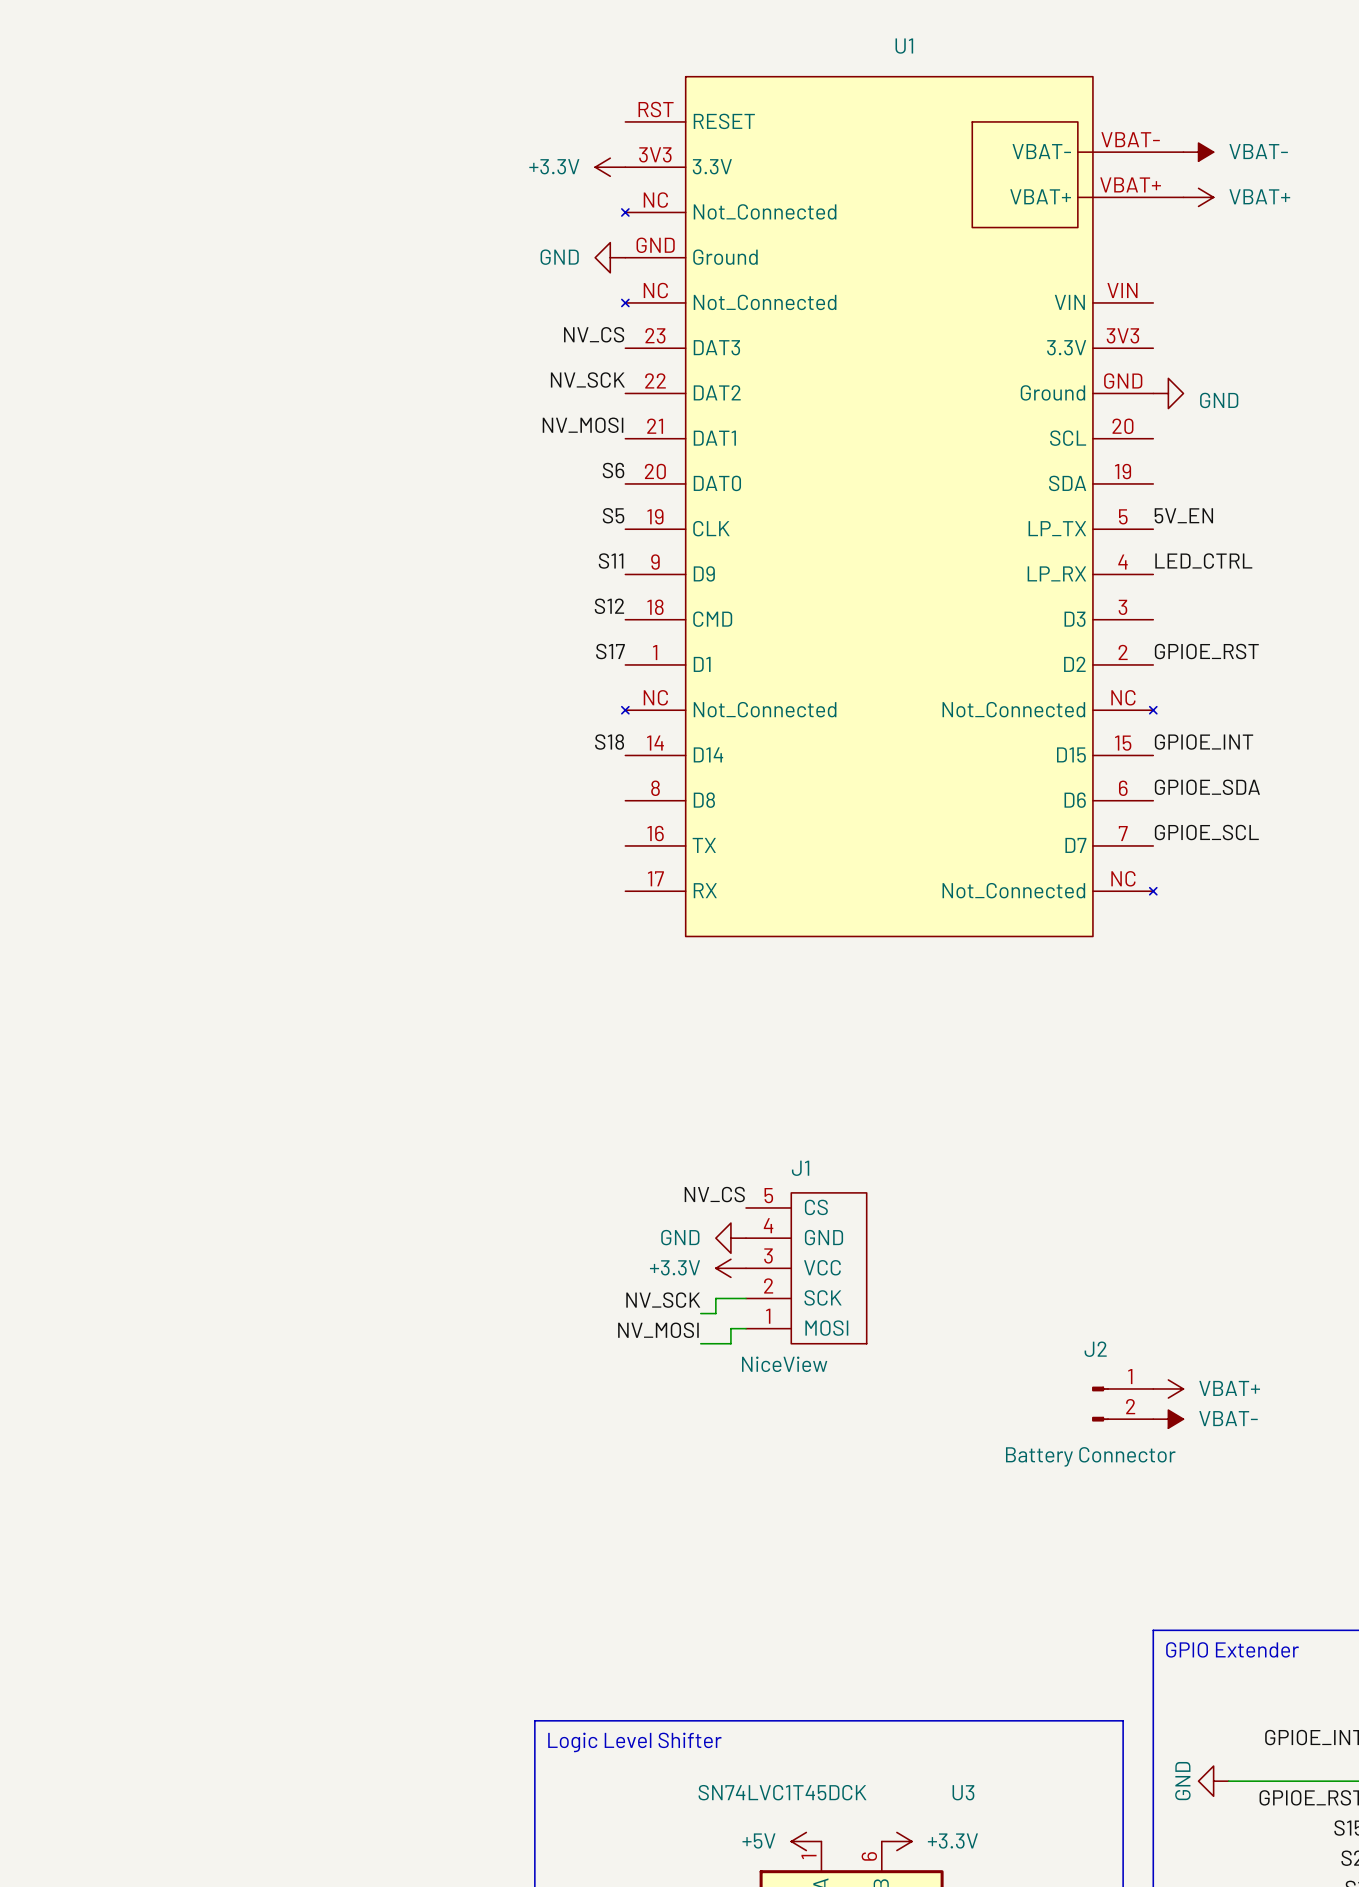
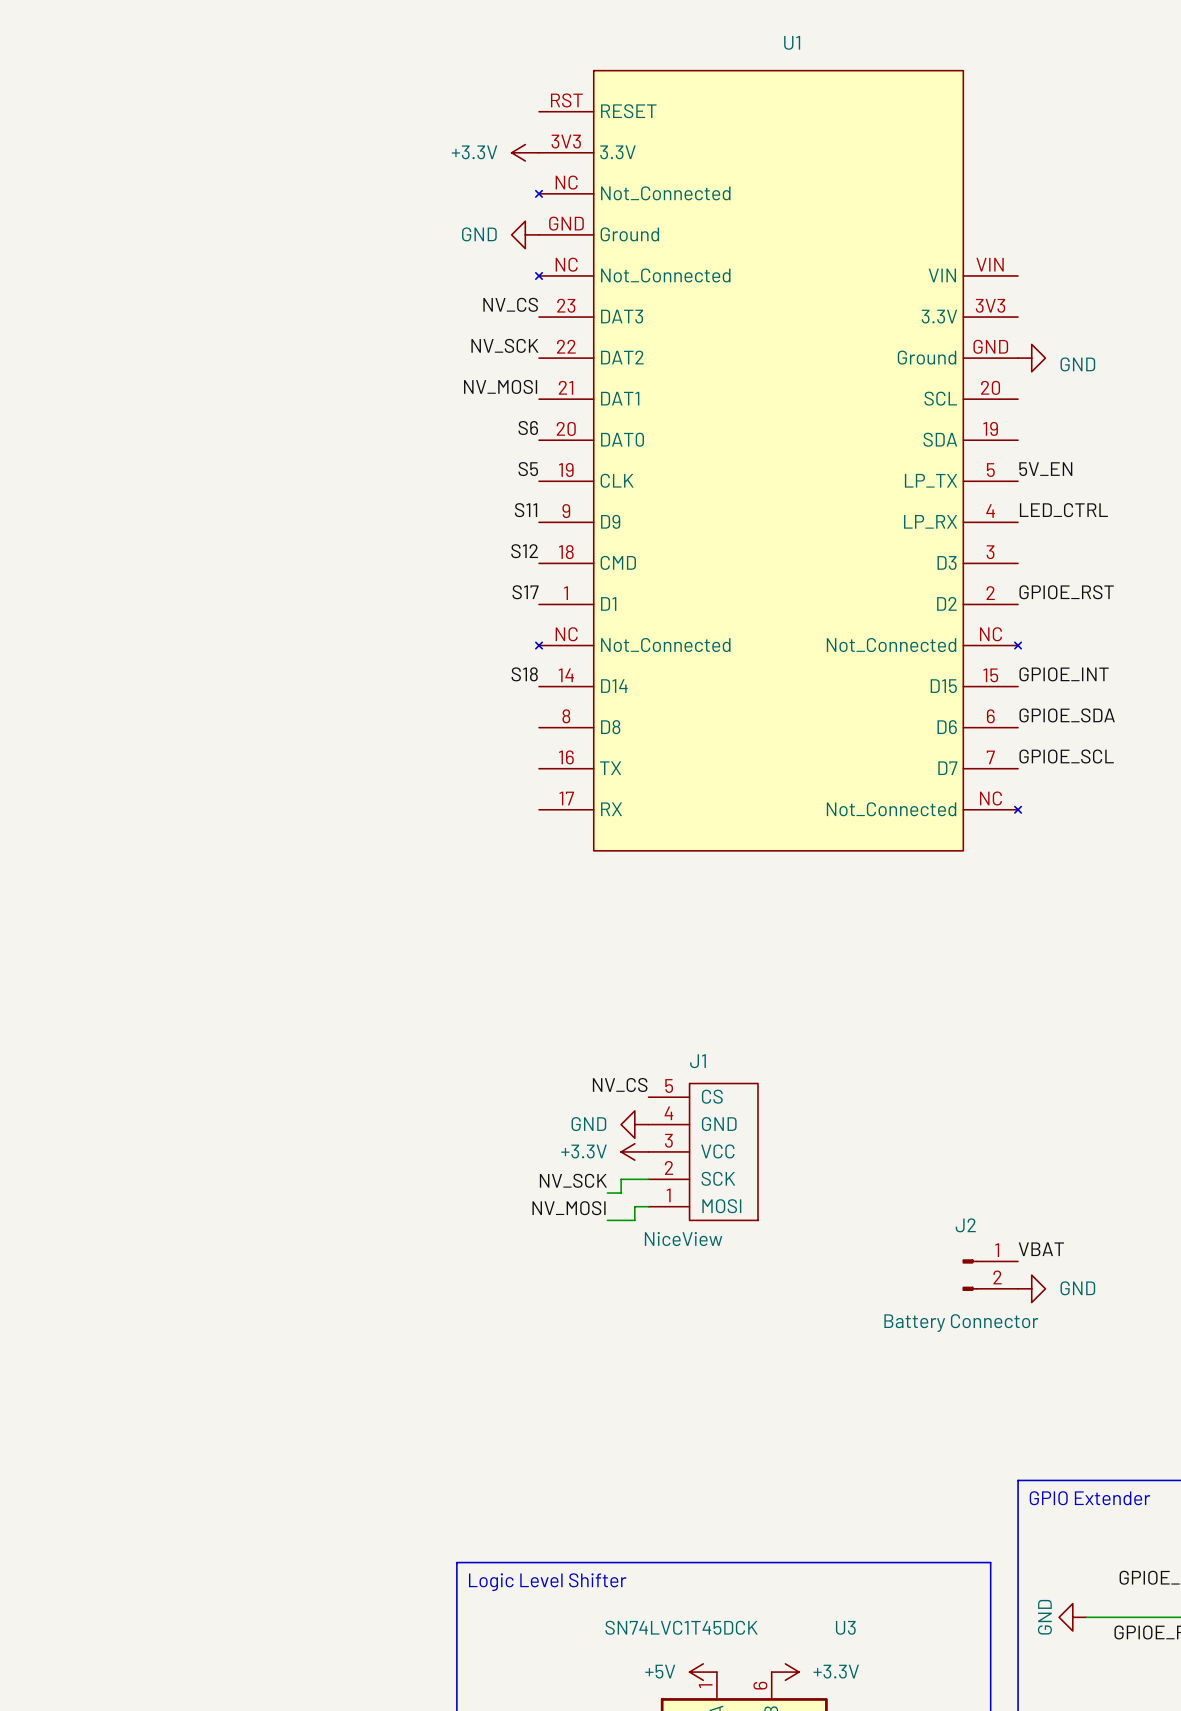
U1 symbol: [621, 76, 1184, 937] -> [535, 70, 1022, 851]
power symbol: VBAT- (1198, 152) -> none
power symbol: VBAT+ (1198, 197) -> none
label: none -> VBAT (1041, 1249)
power symbol: VBAT+ (1168, 1388) -> none
power symbol: VBAT- (1168, 1419) -> GND (1031, 1288)

